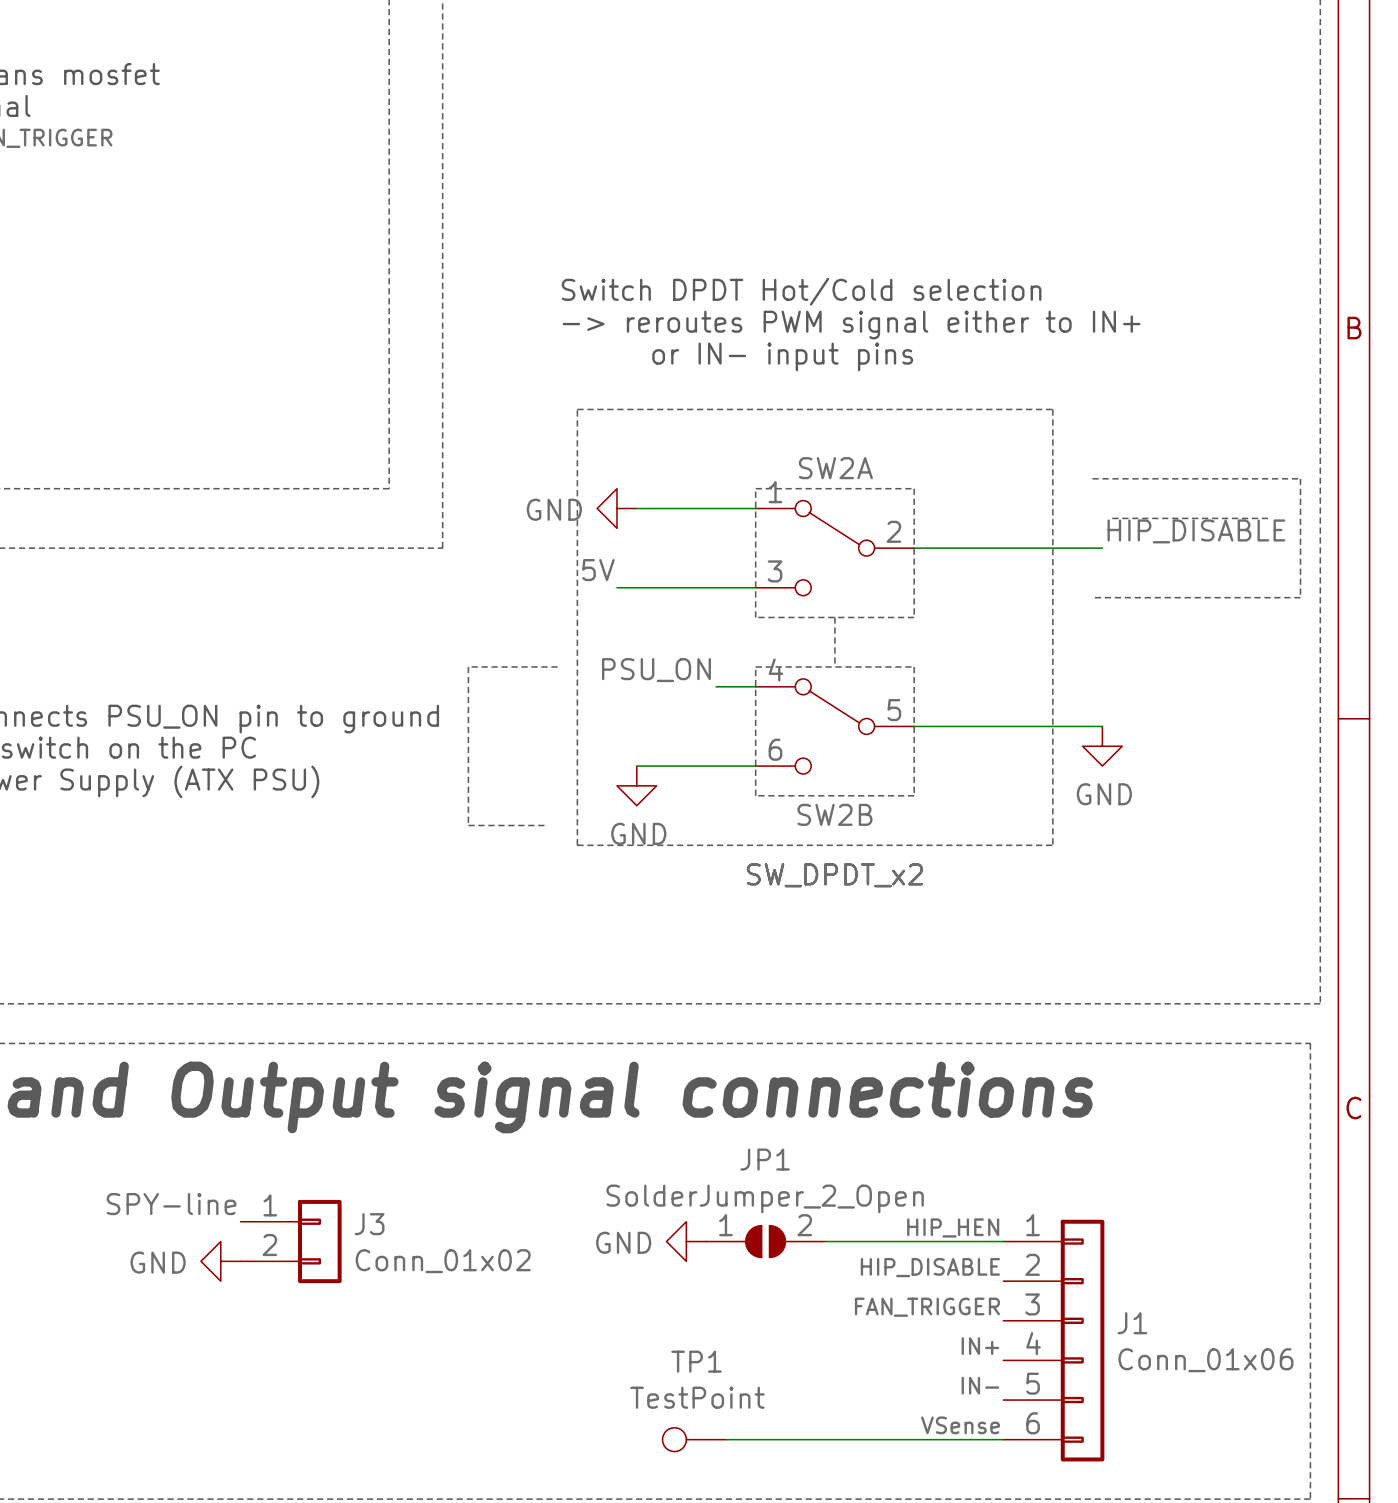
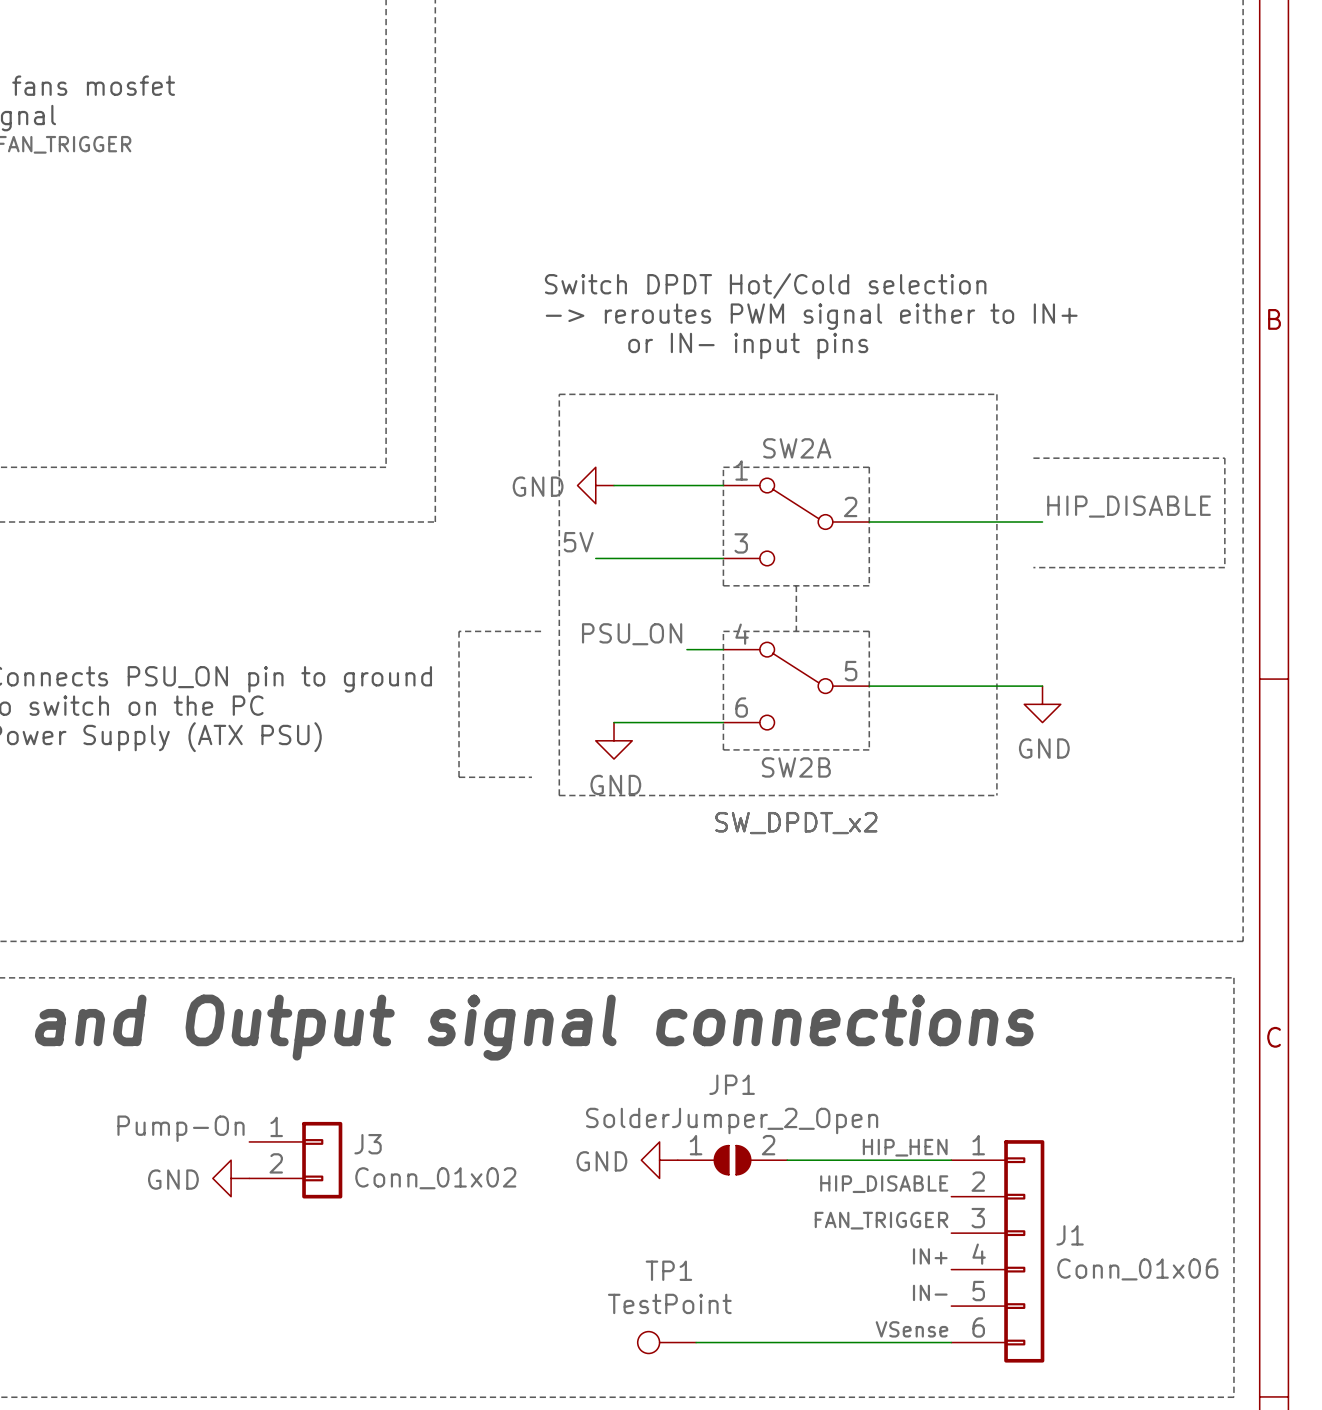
line: (1112, 518) (1270, 518) -> none
label: SPY-line (171, 1204) -> Pump-On (181, 1128)

